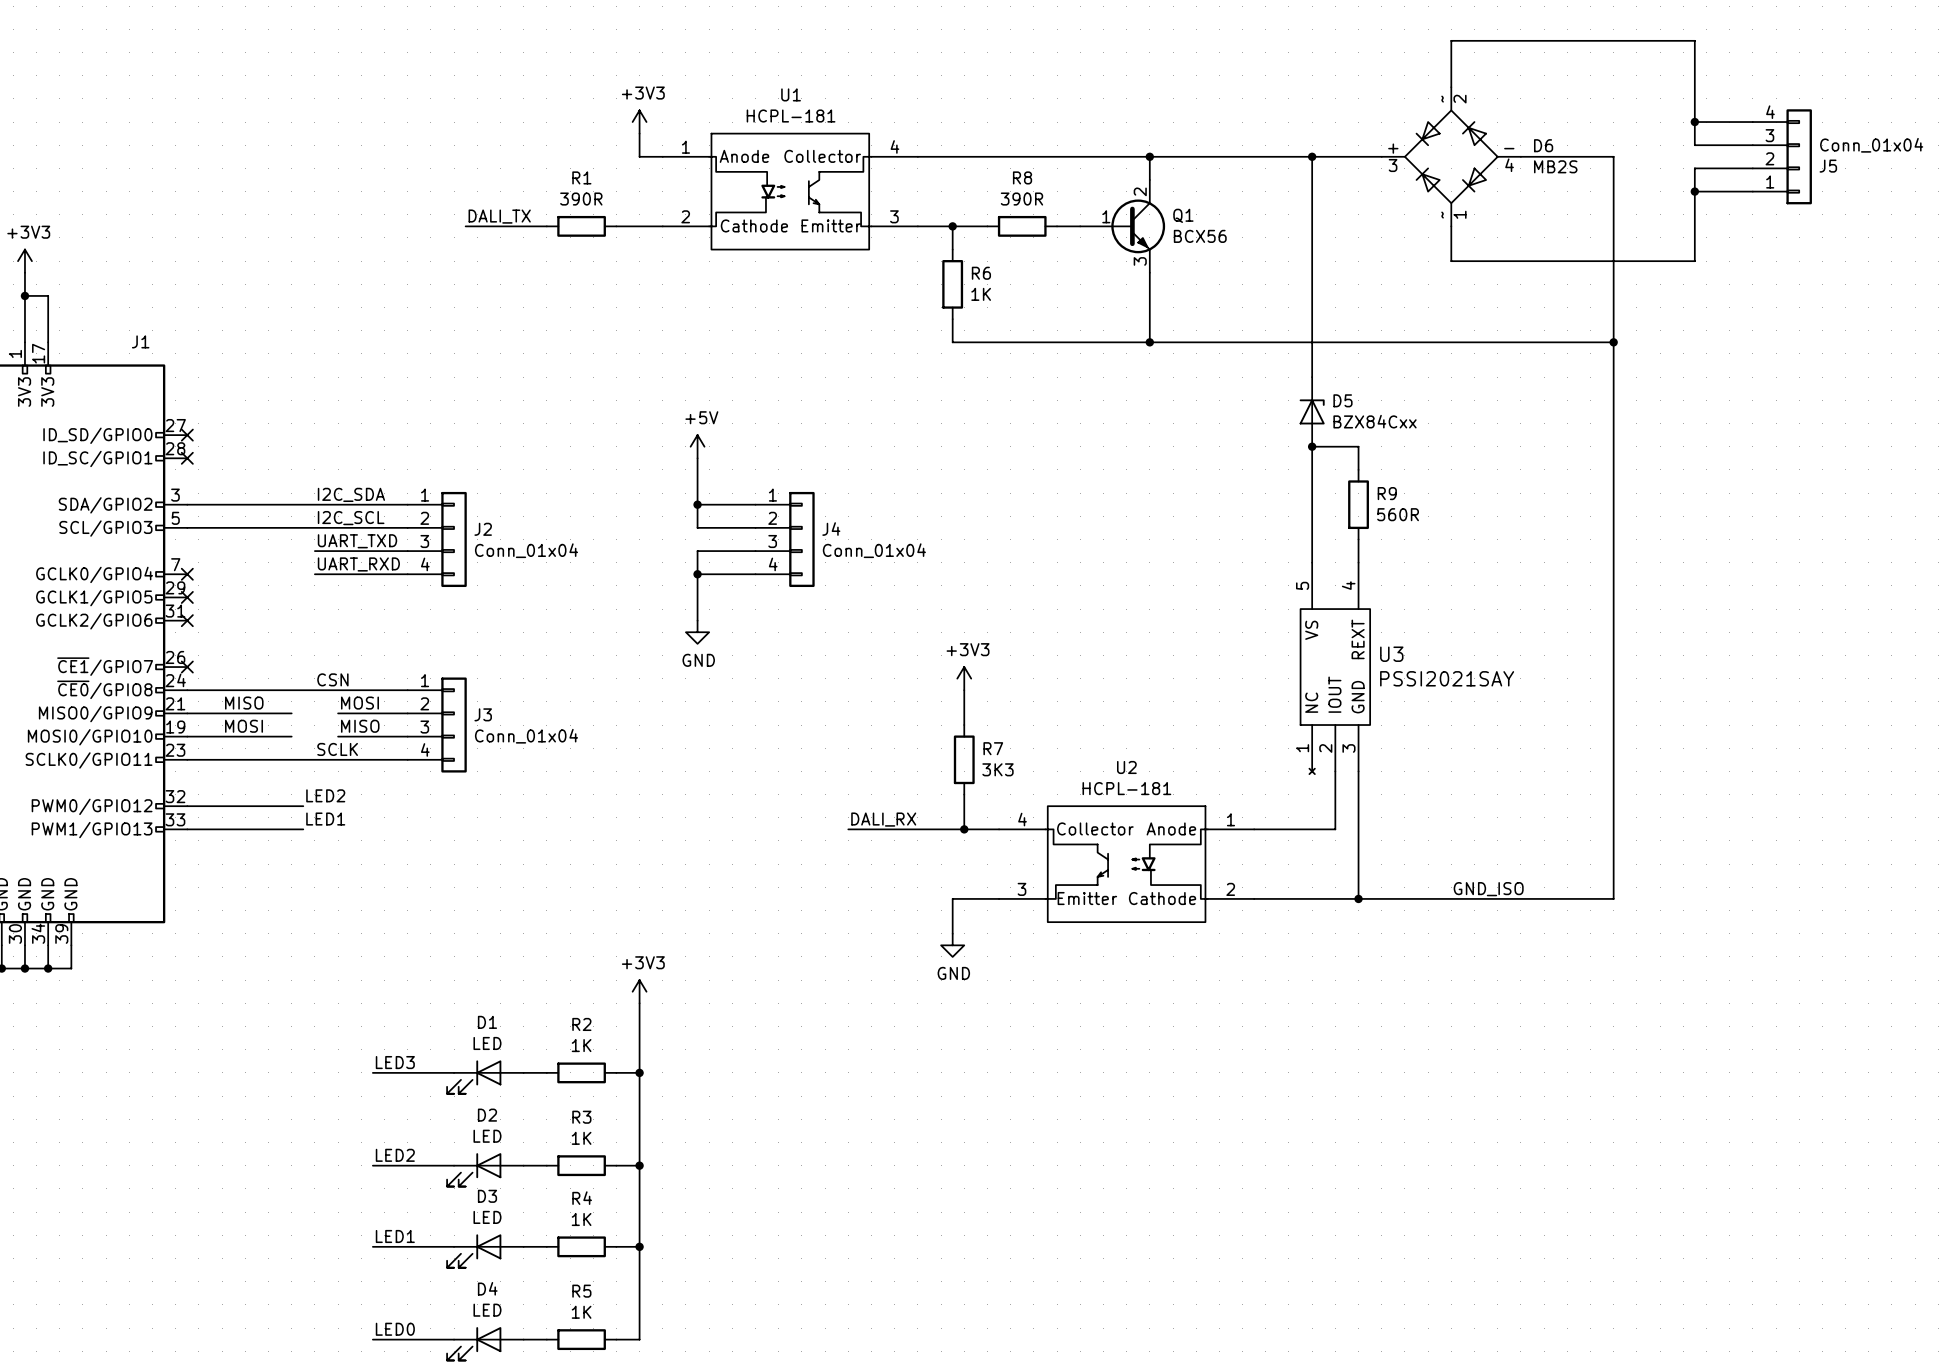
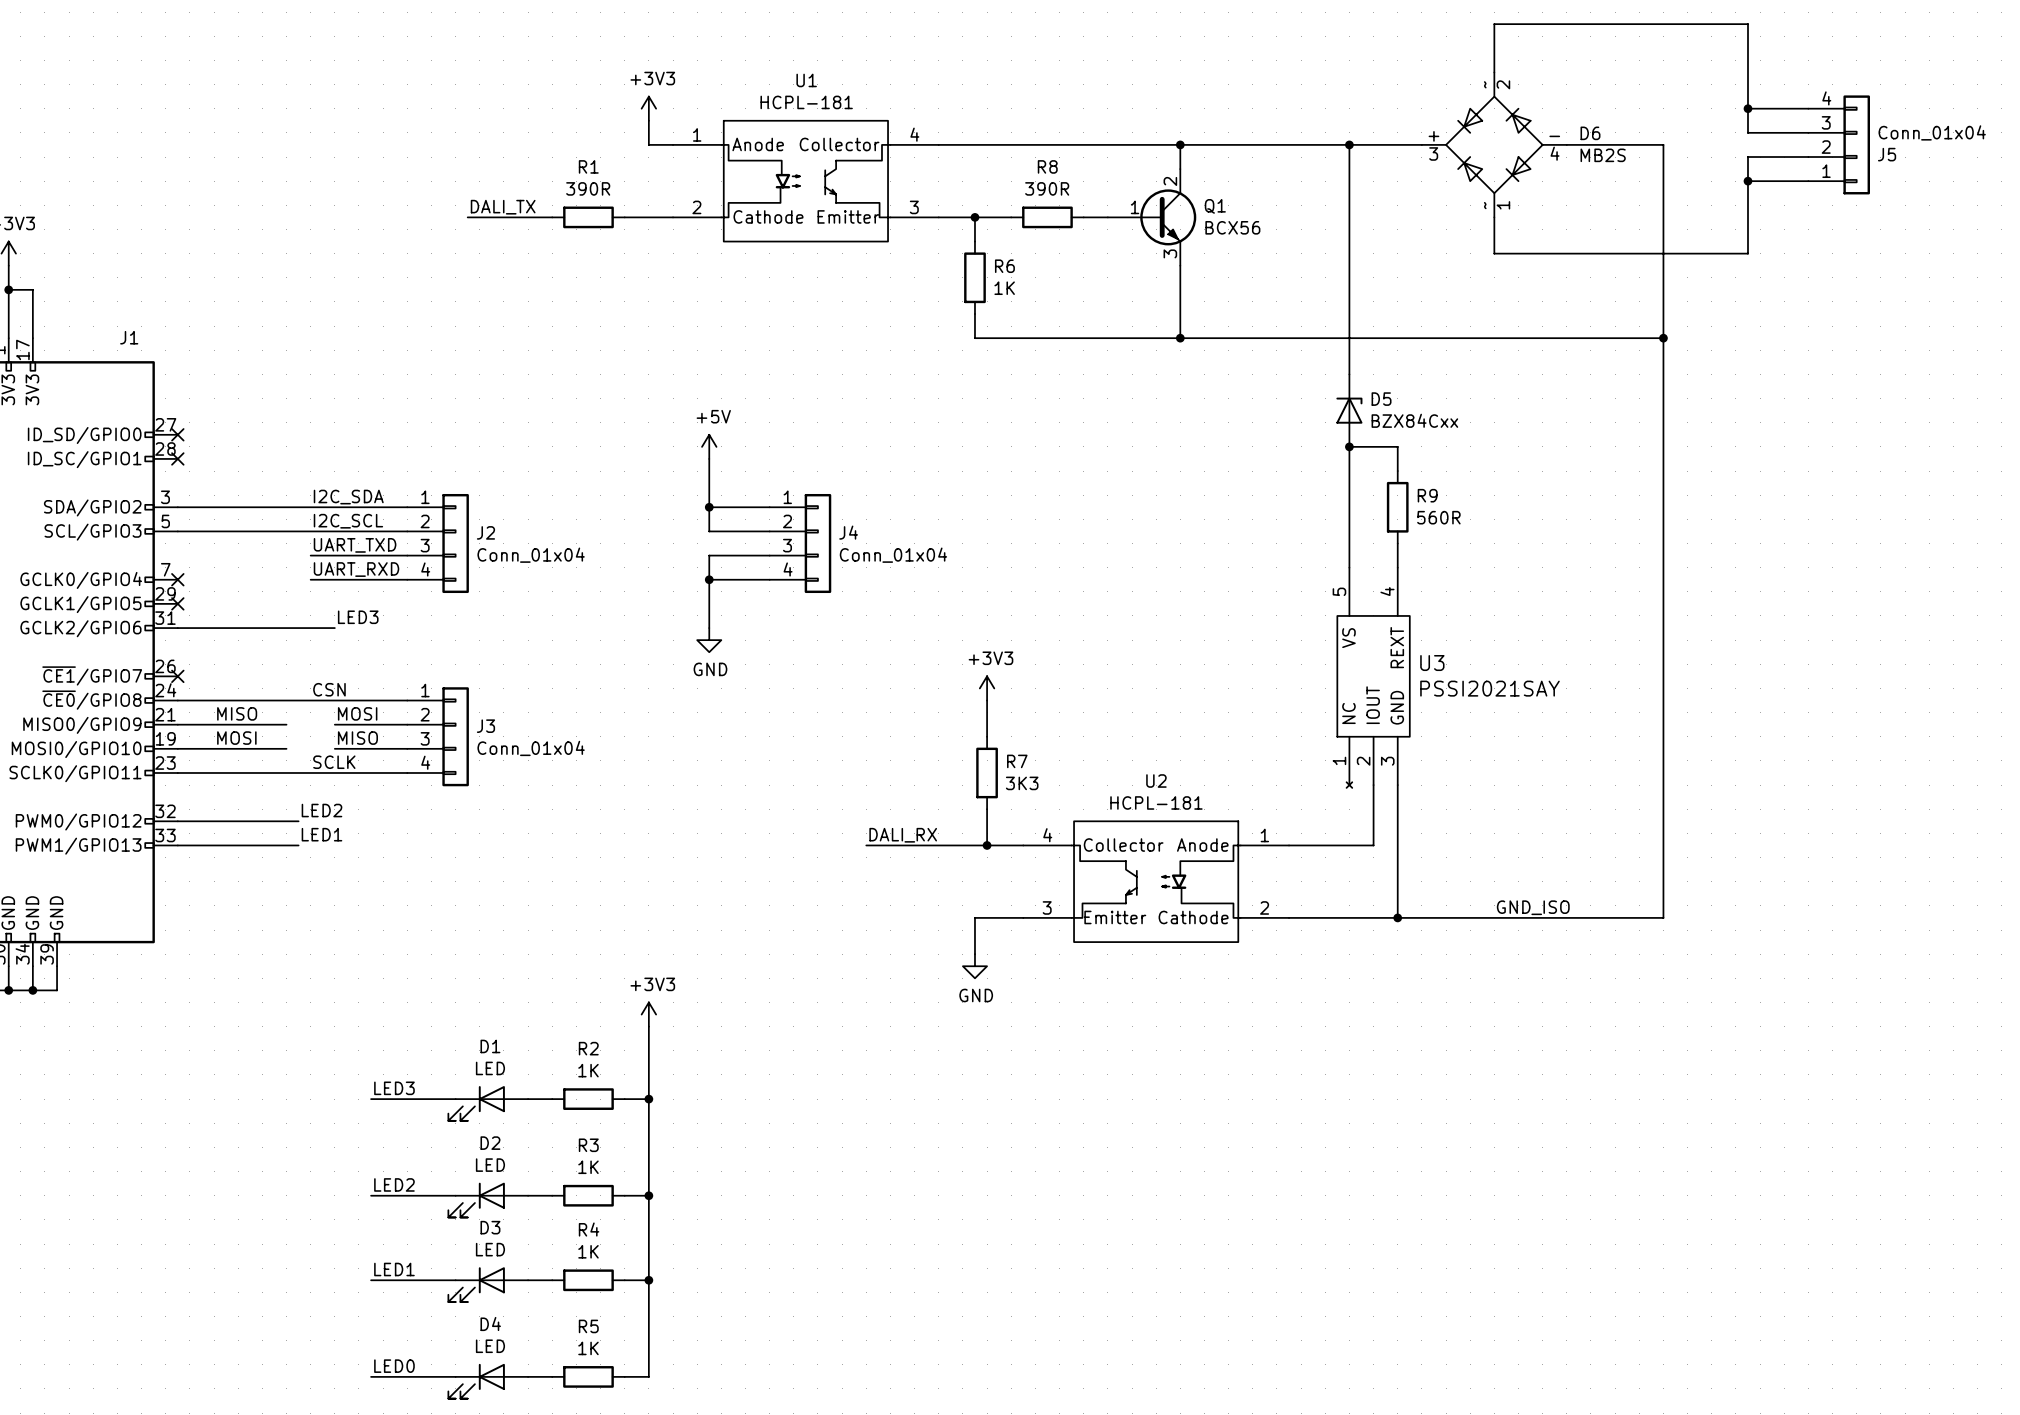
label: none -> LED3 (358, 617)
wire: none -> (177, 628) (334, 628)
no-connect mark: (187, 620) -> none

